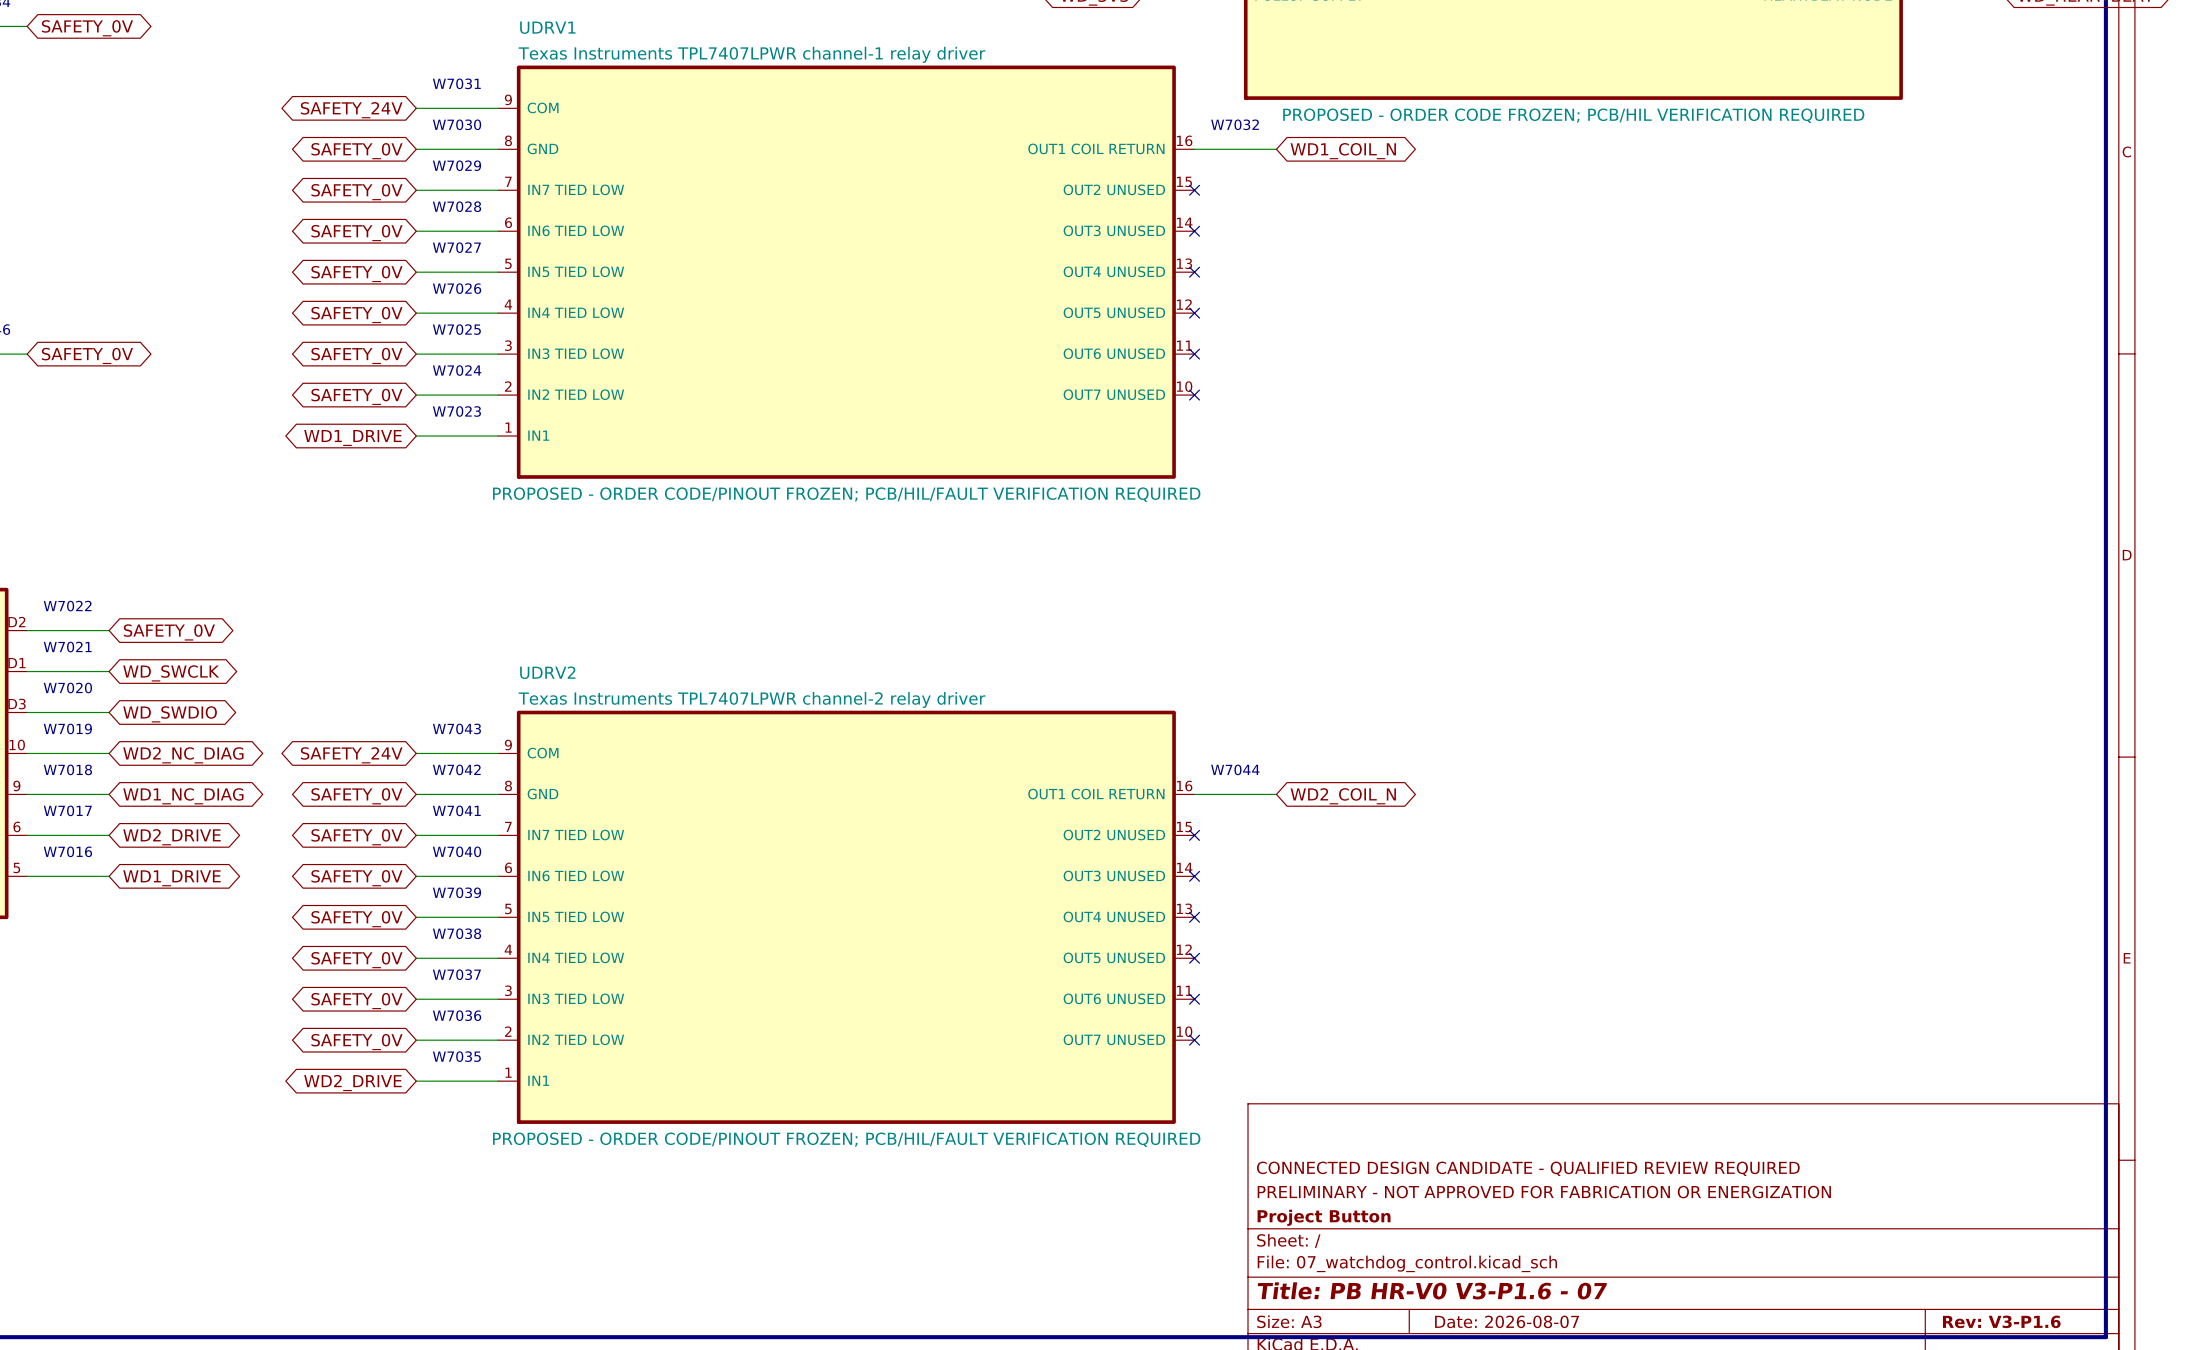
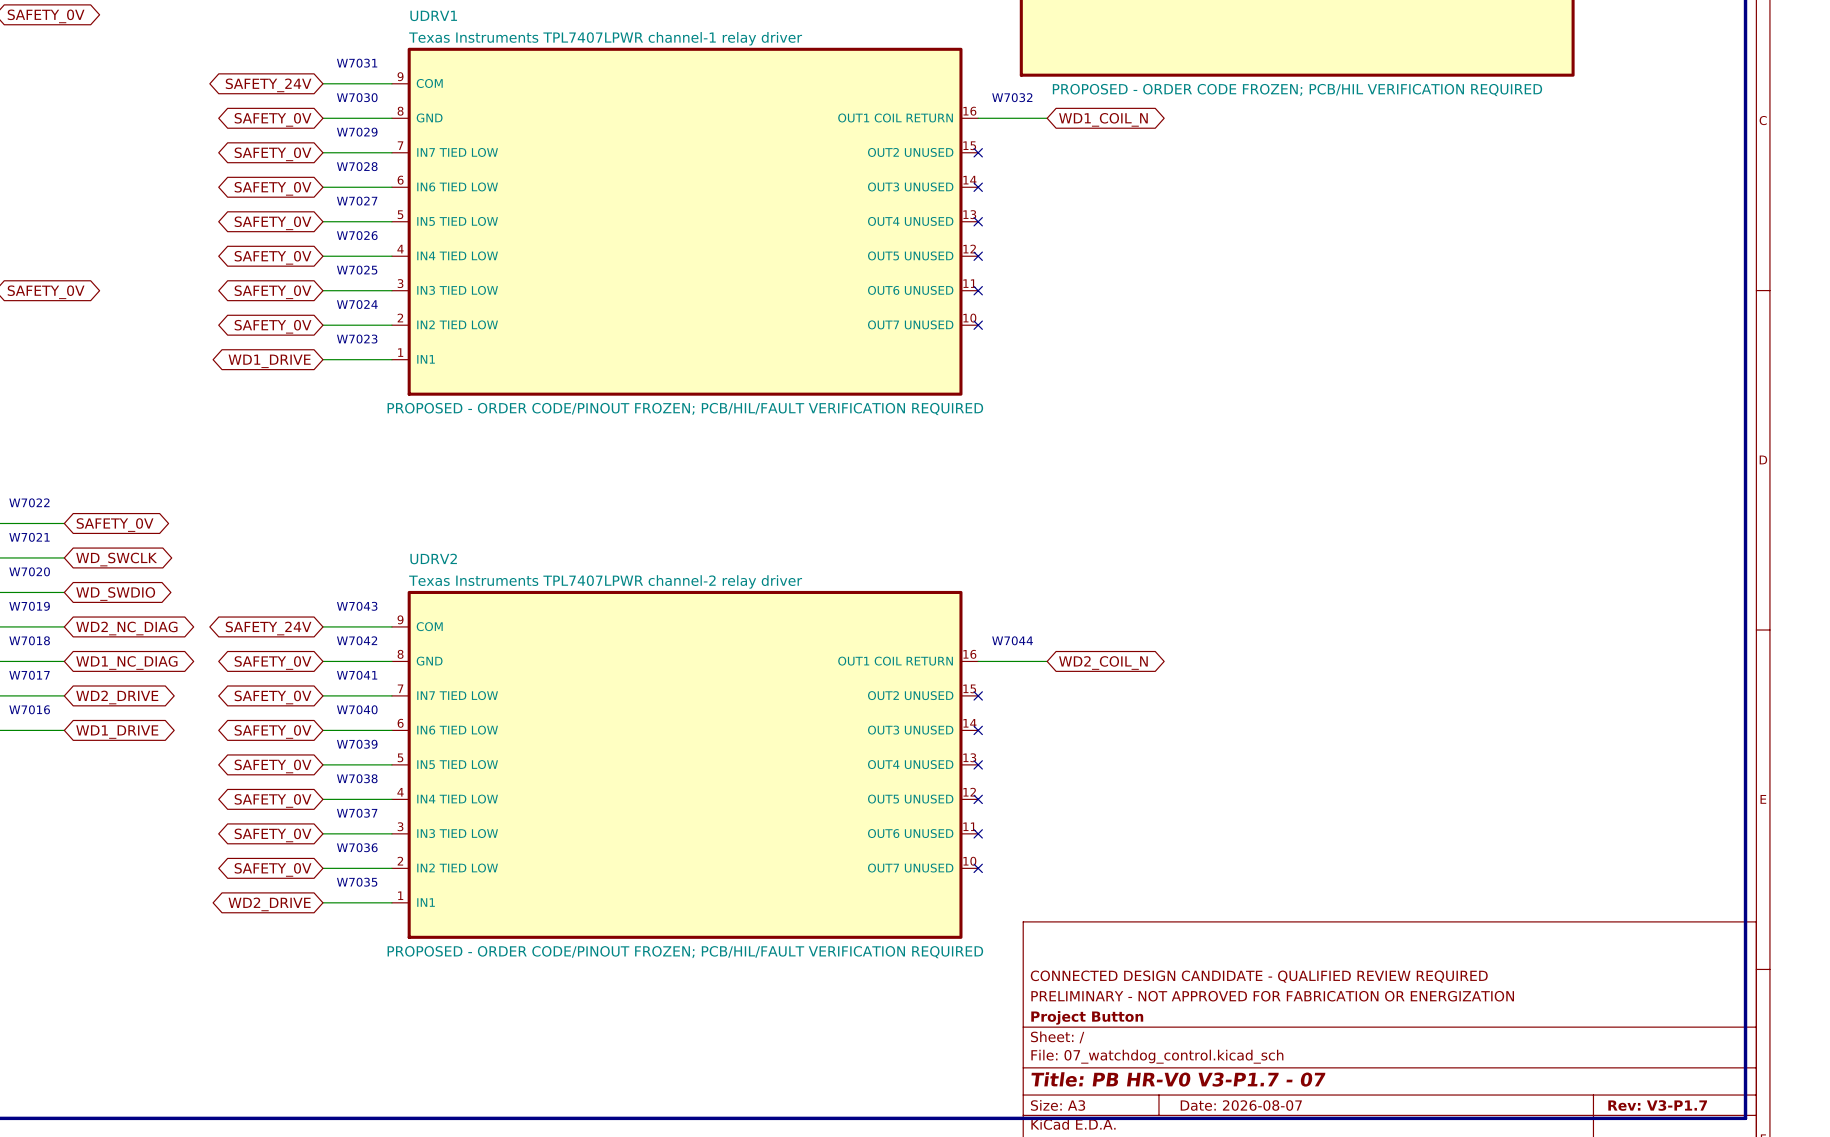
title block: Title: PB HR-V0 V3-P1.6 - 07 (1432, 1290) -> Title: PB HR-V0 V3-P1.7 - 07 (1178, 1079)
title block: Rev: V3-P1.6 (2001, 1321) -> Rev: V3-P1.7 (1657, 1105)

